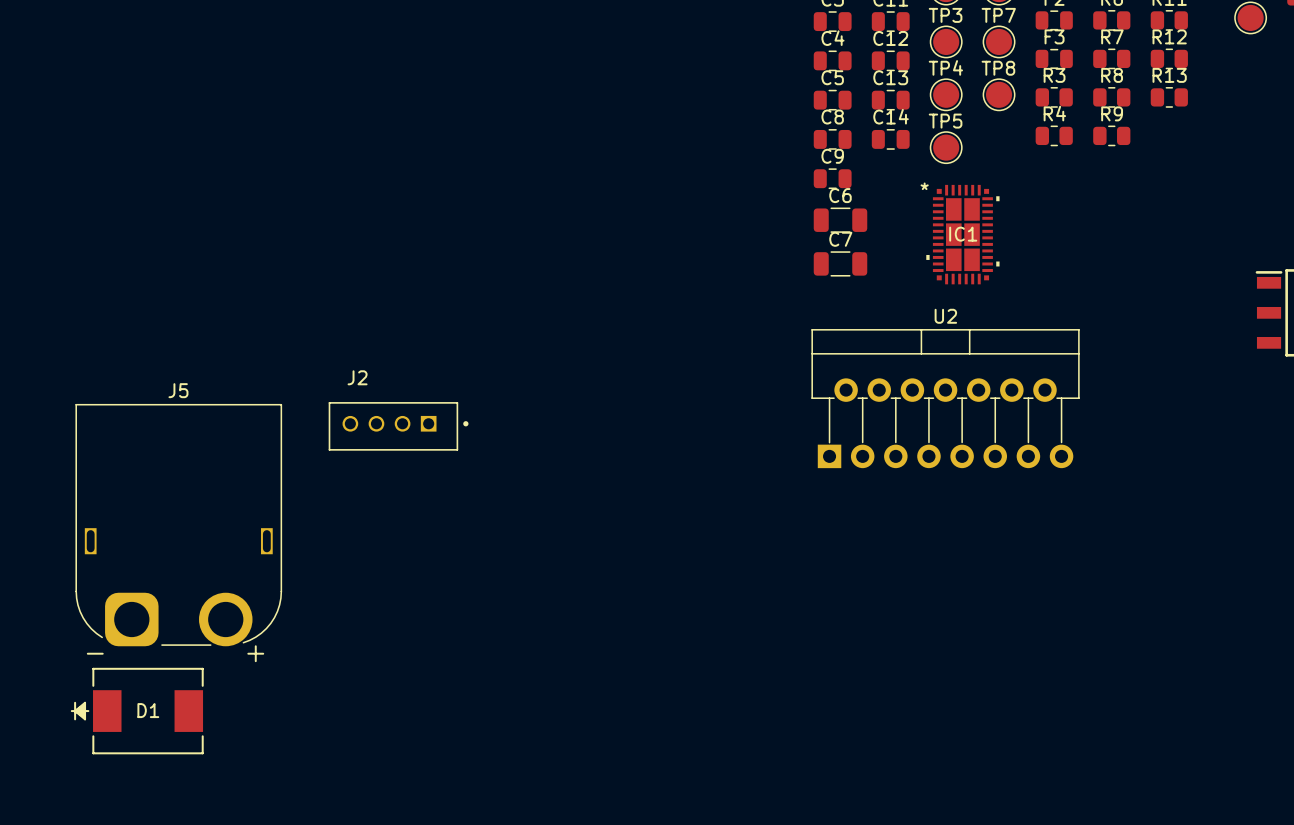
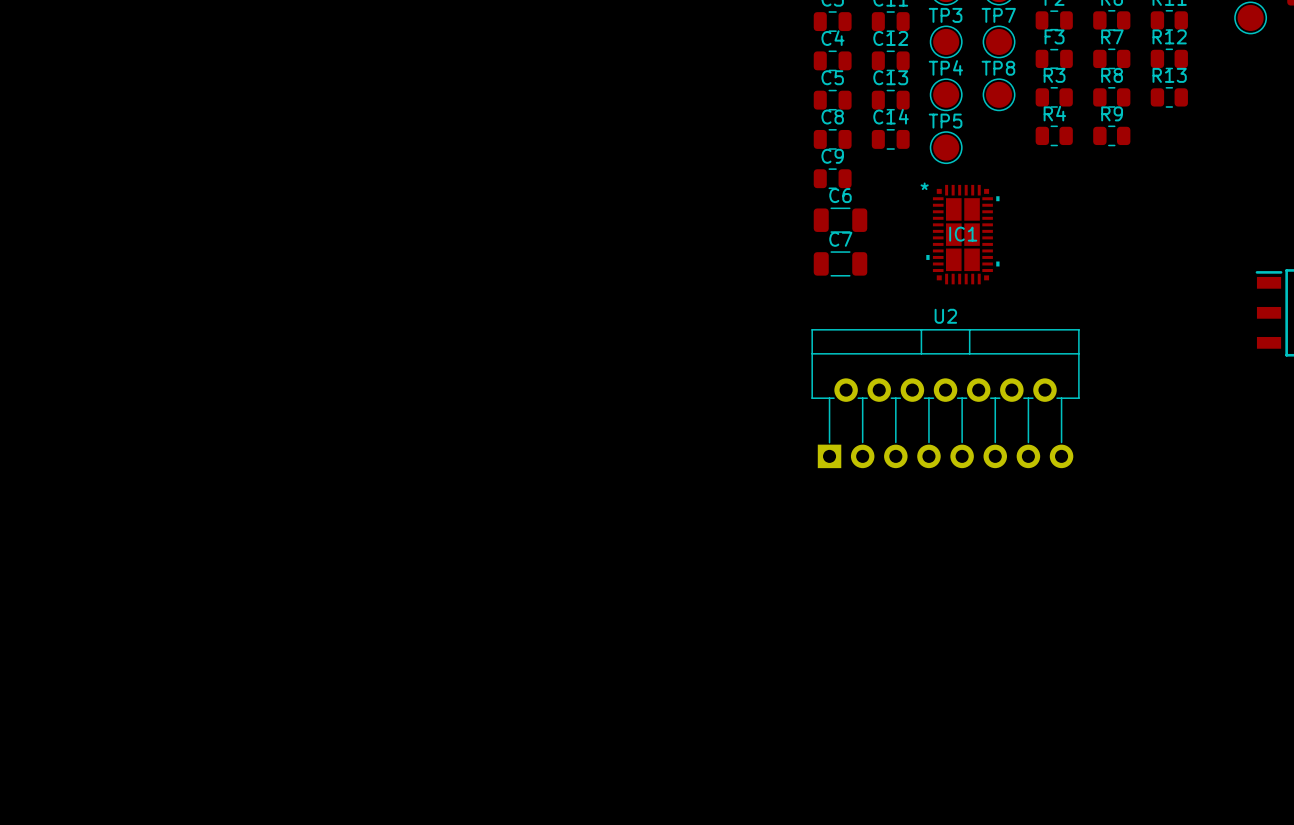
J2: (398, 426) -> none
J5: (178, 525) -> none
D1: (137, 711) -> none

